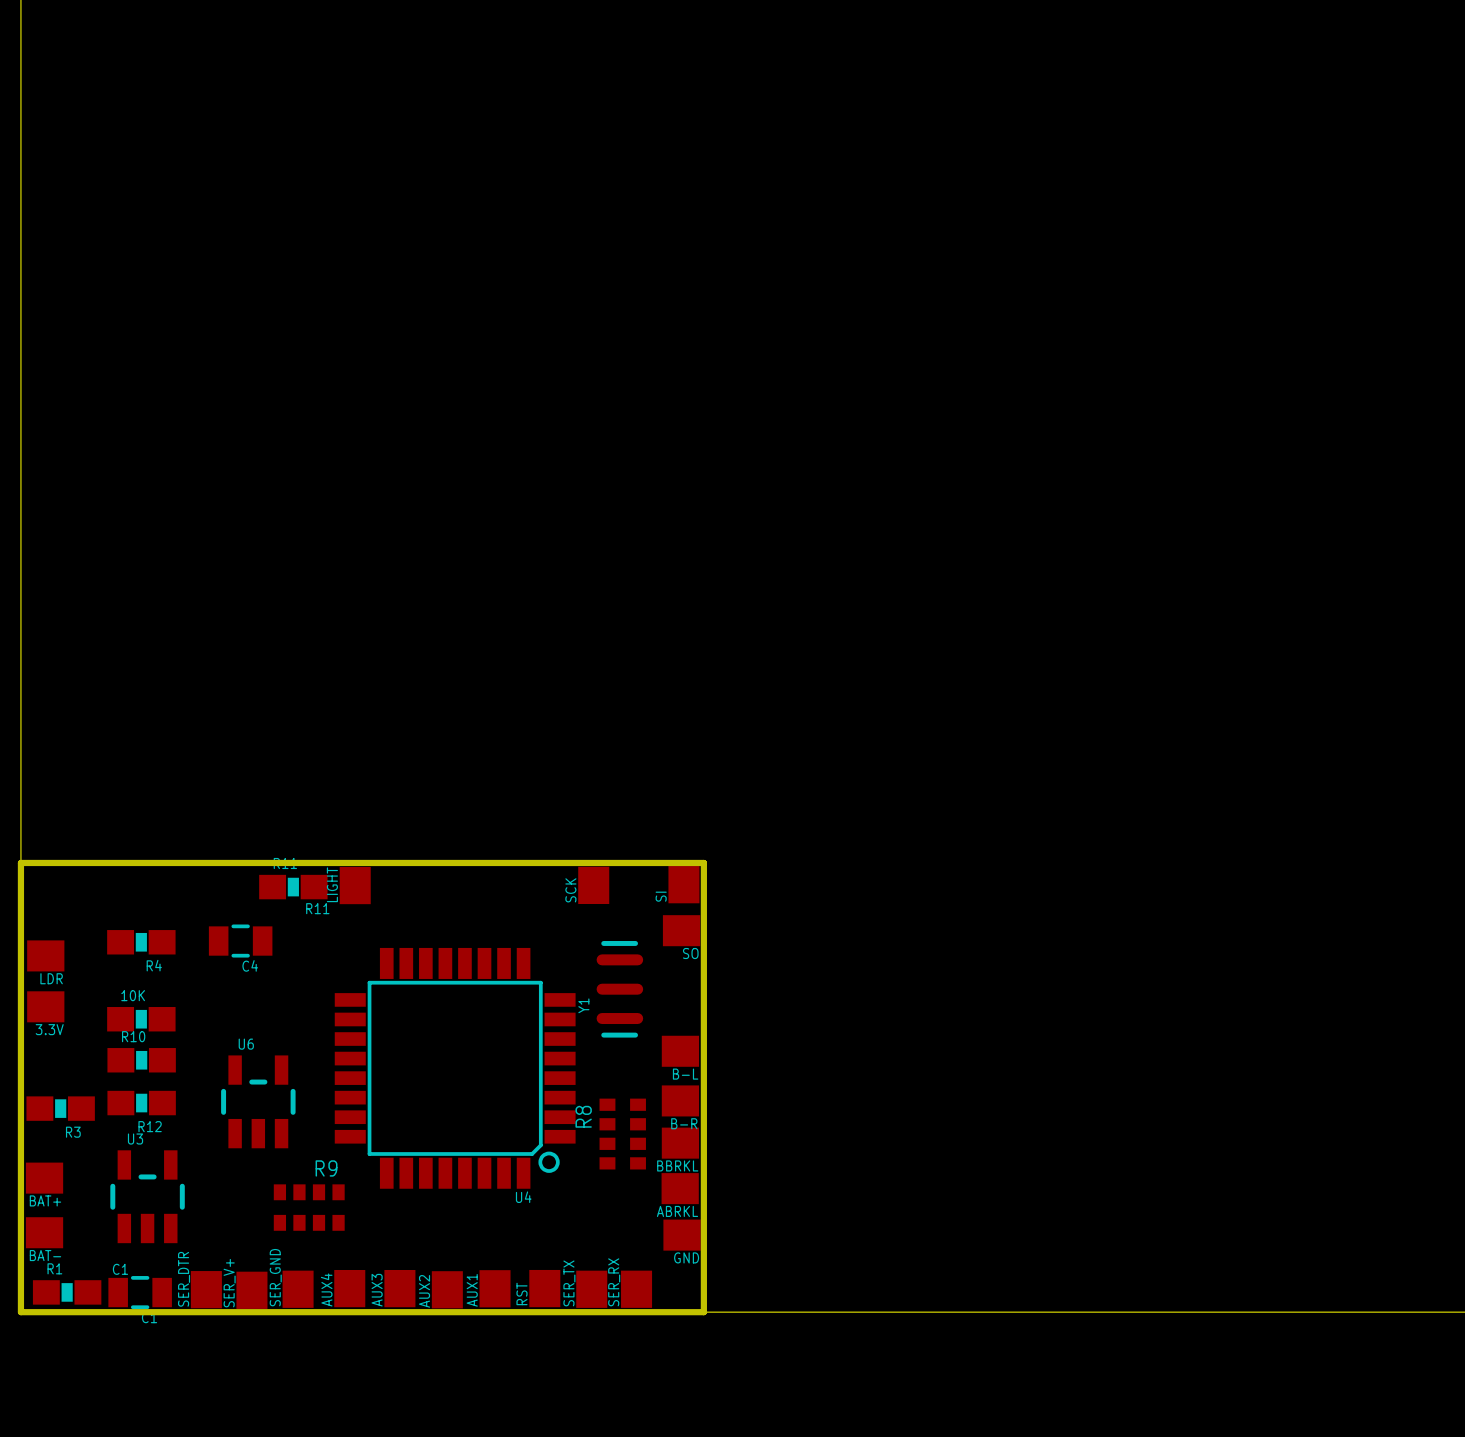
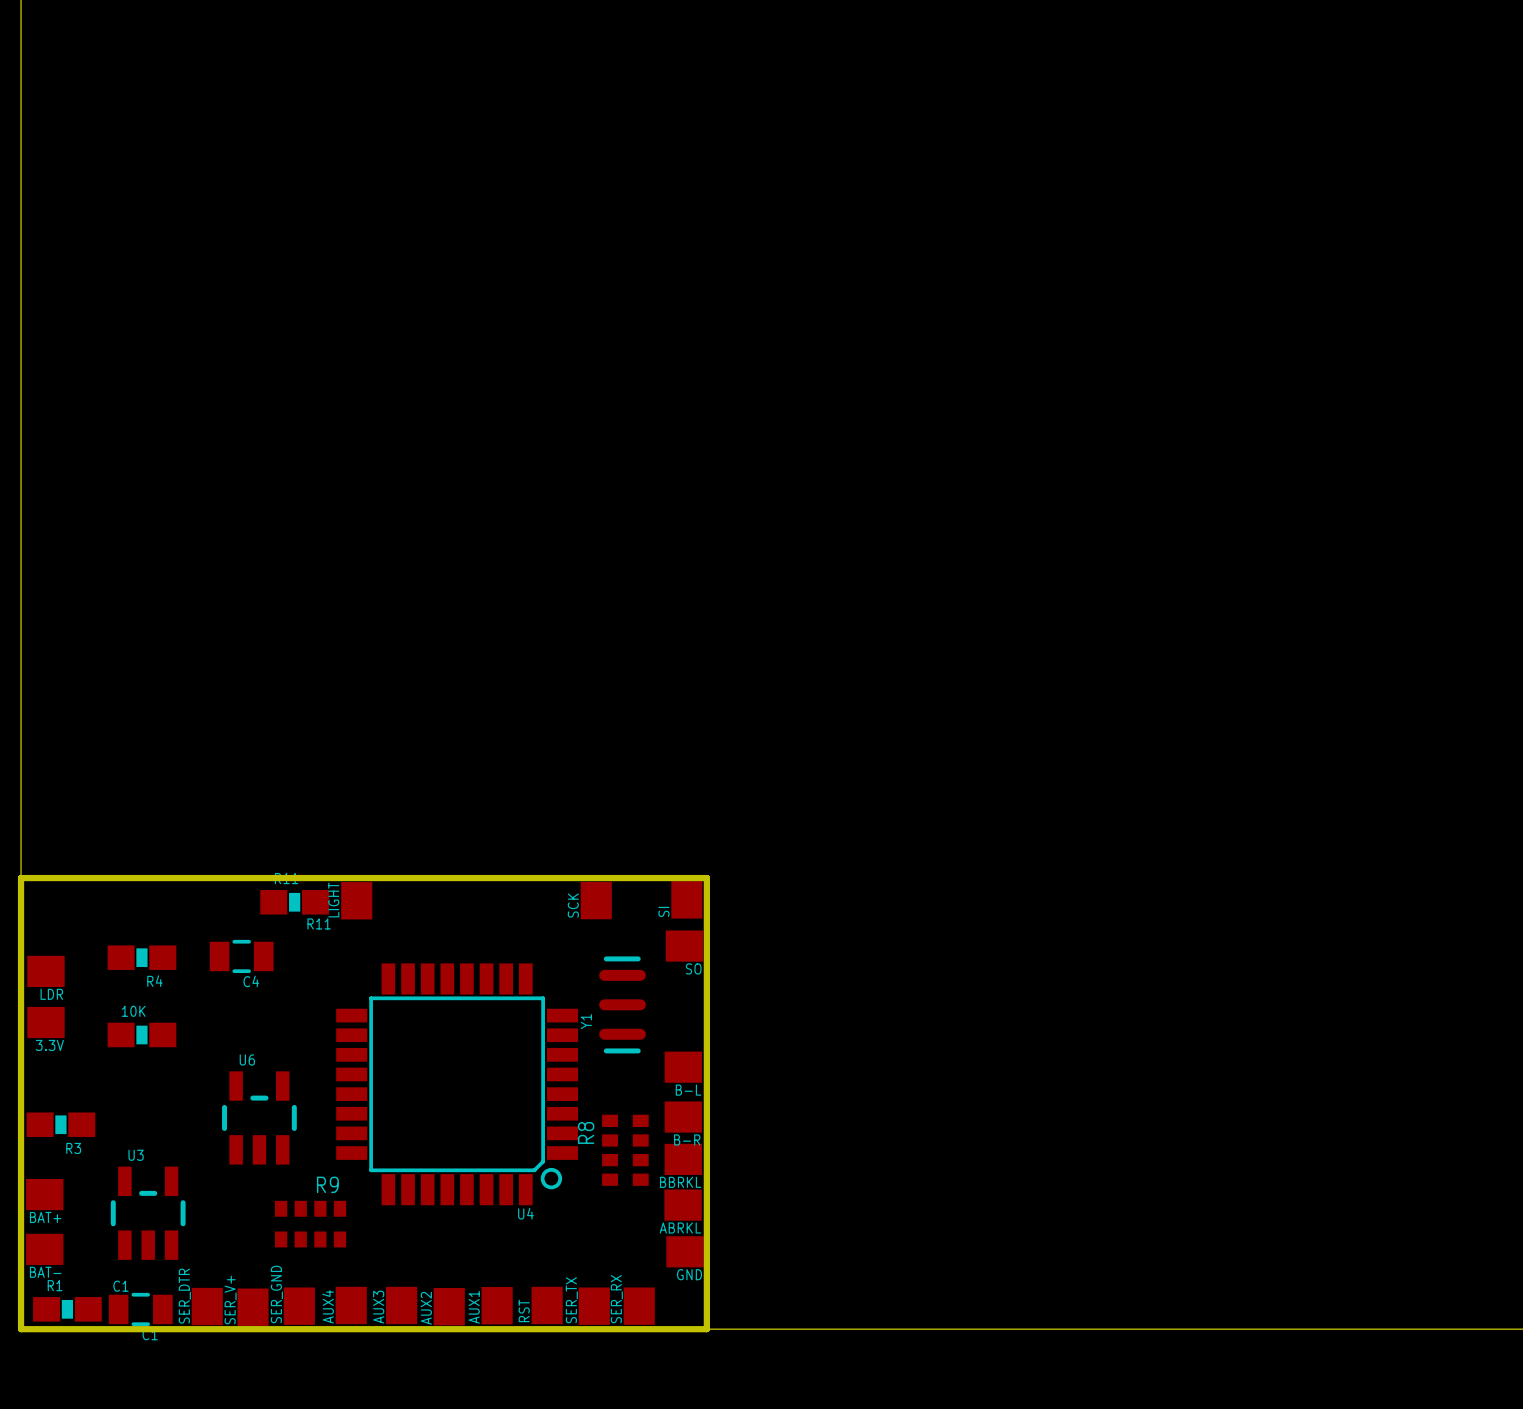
R10: (141, 1060) -> none
R12: (141, 1103) -> none

